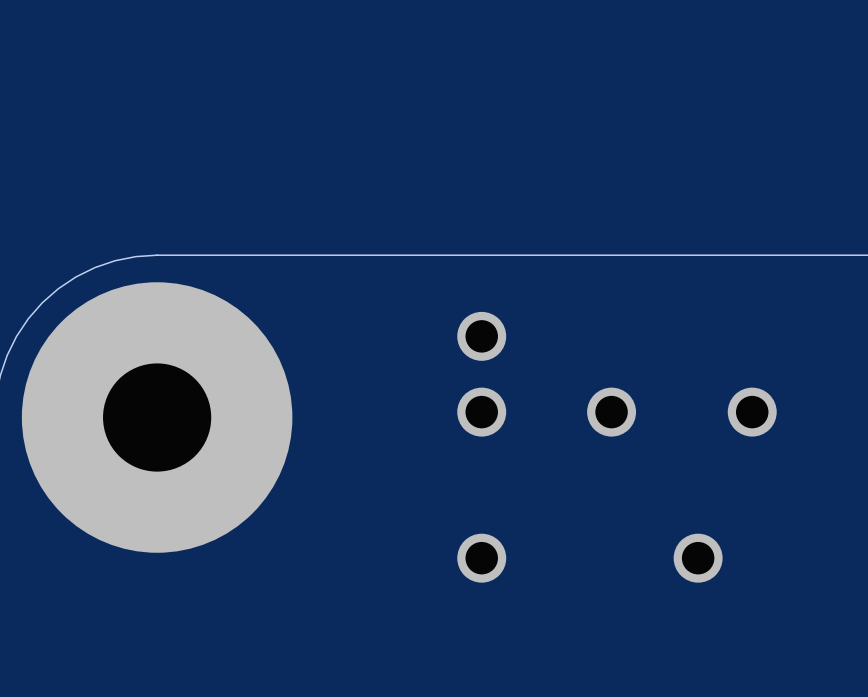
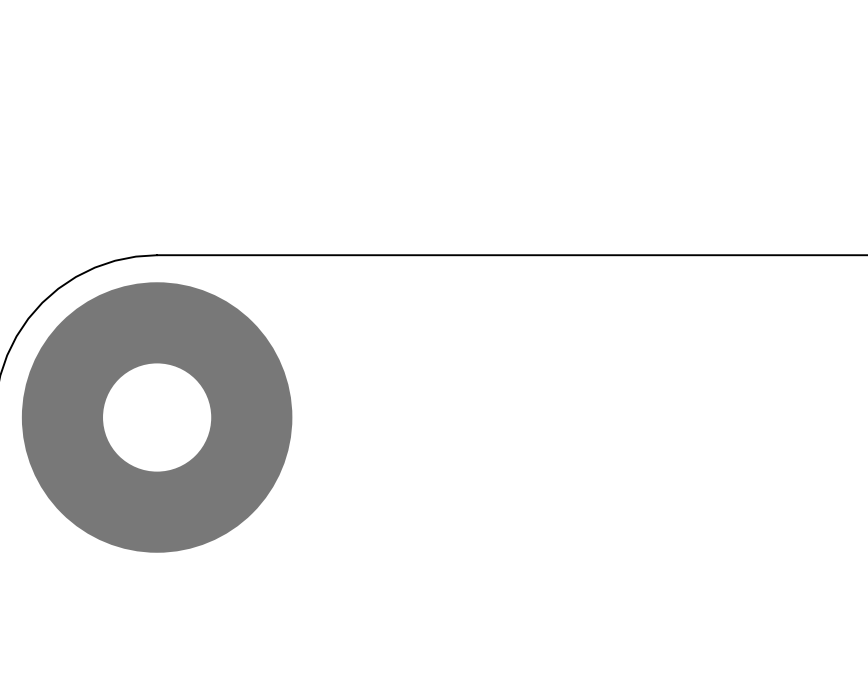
via: (481, 336) -> none
via: (481, 412) -> none
via: (611, 412) -> none
via: (752, 412) -> none
via: (481, 558) -> none
via: (698, 558) -> none

